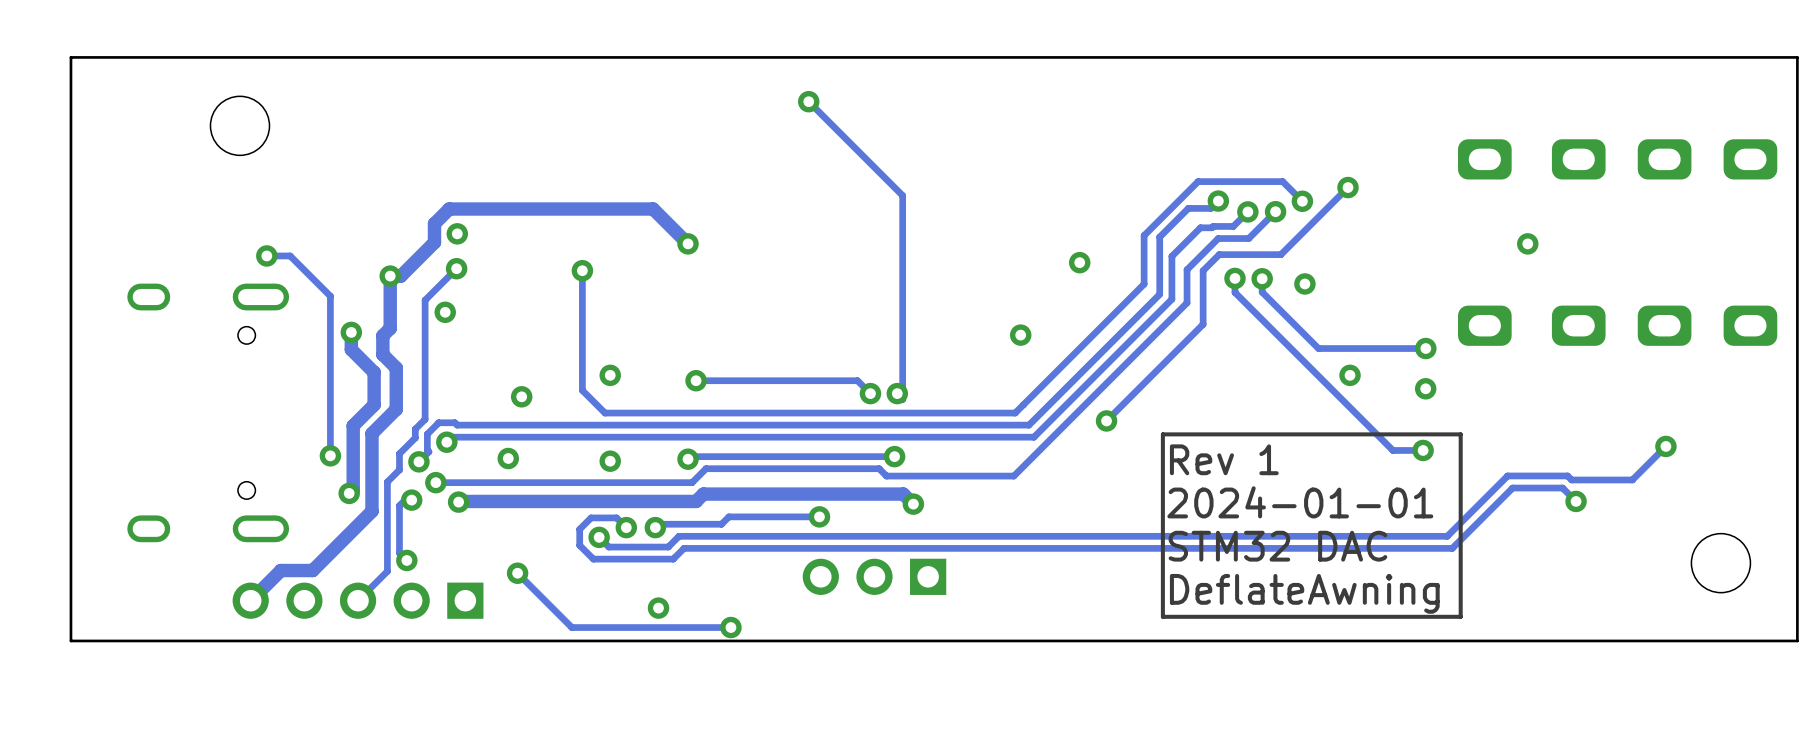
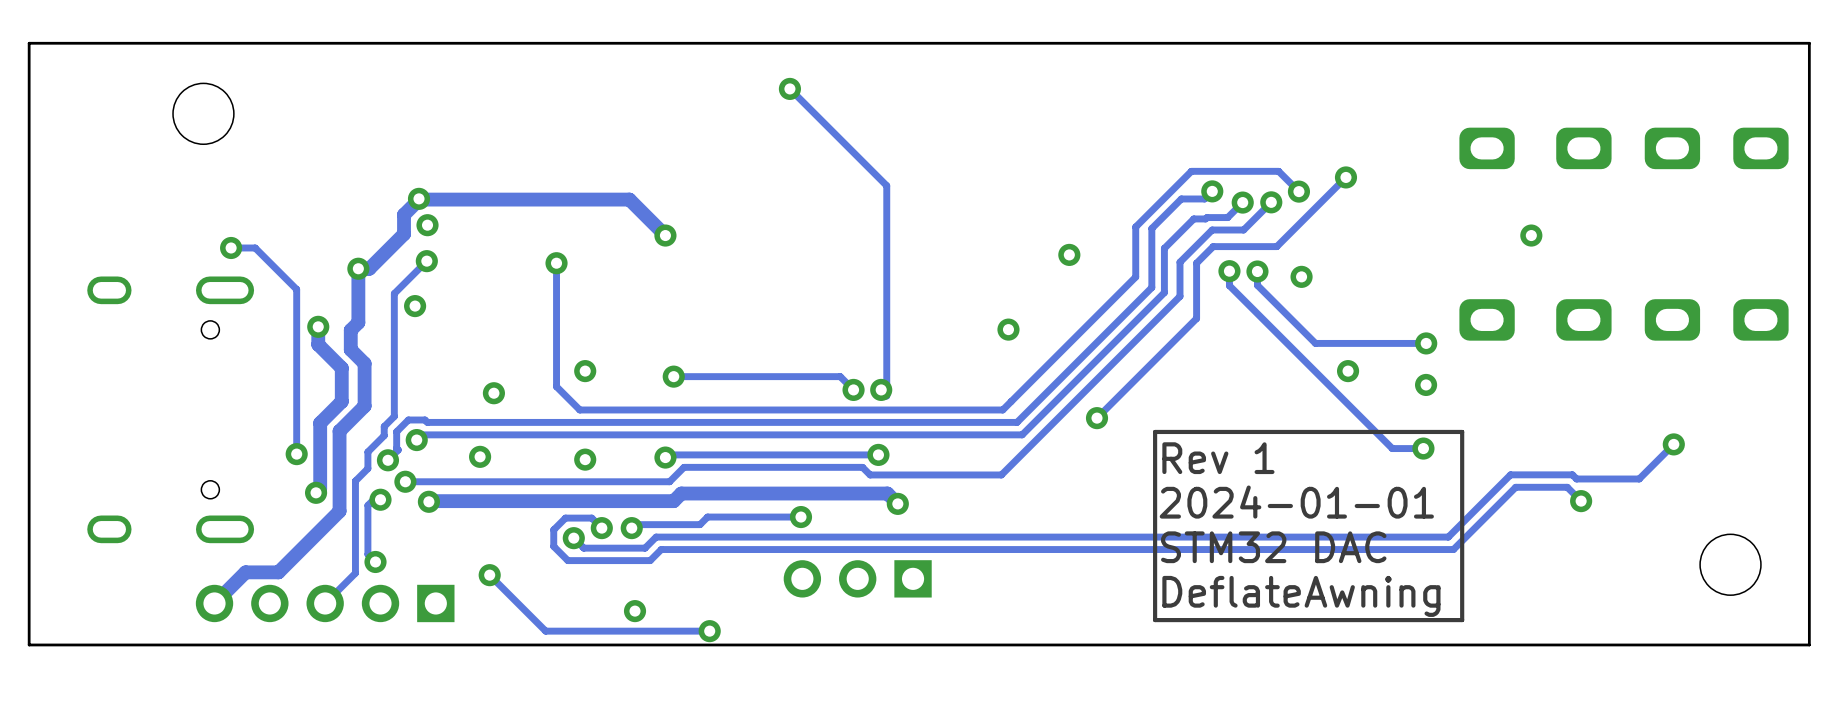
via: none -> (418, 198)

